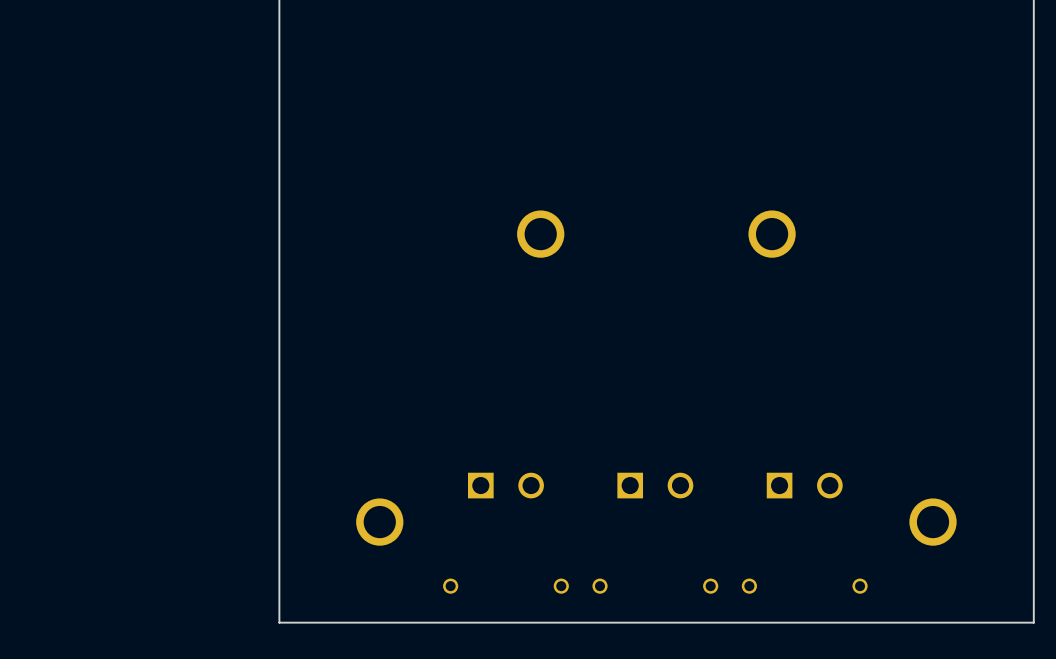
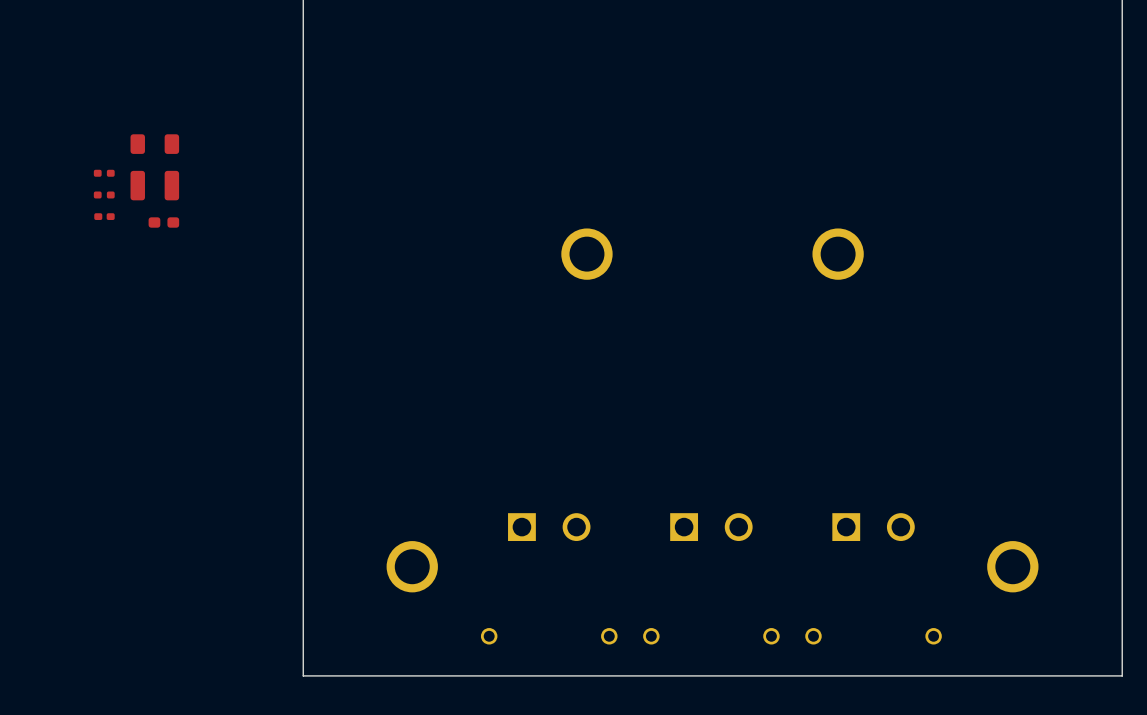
part: none -> (154, 144)
part: none -> (104, 173)
part: none -> (154, 185)
part: none -> (104, 194)
part: none -> (104, 216)
part: none -> (163, 222)

